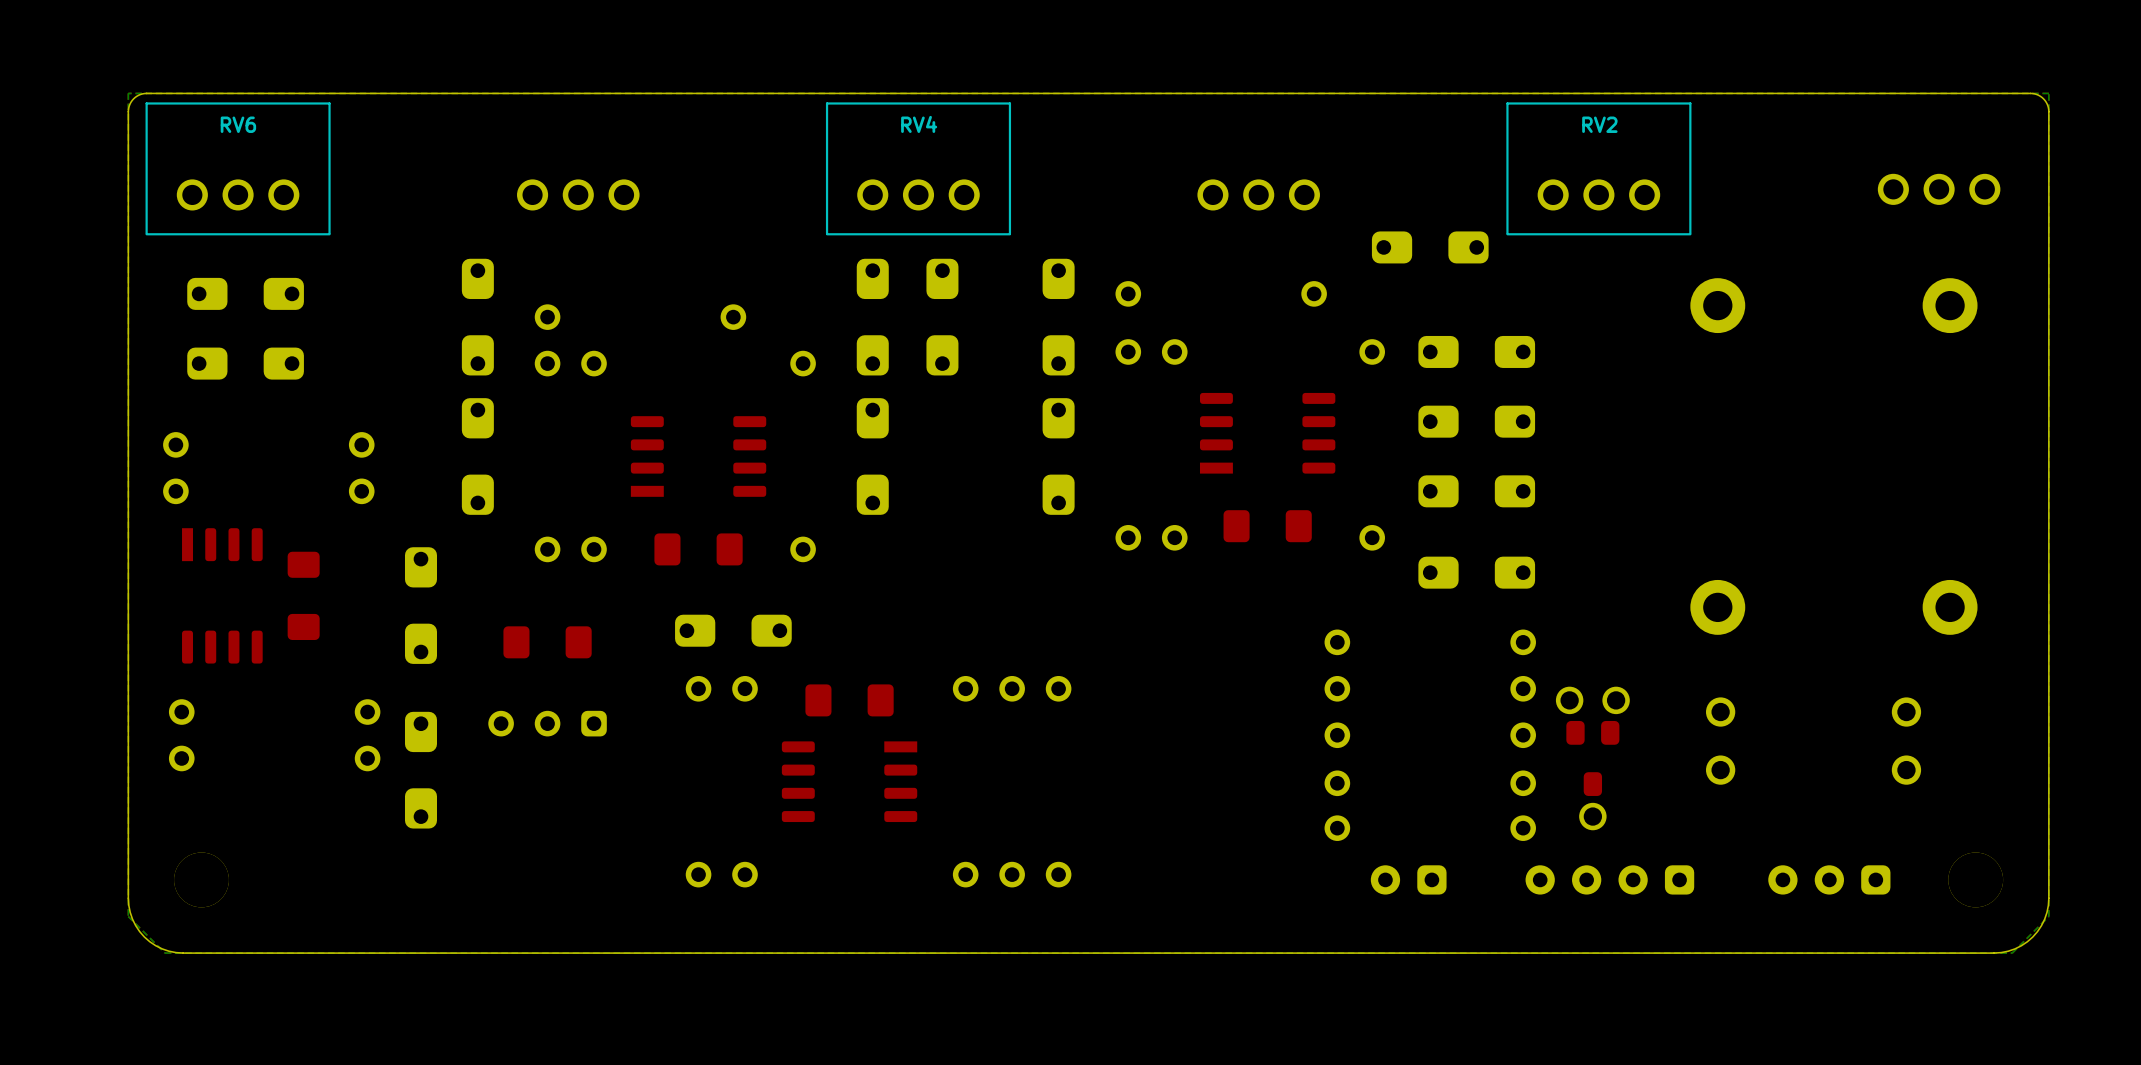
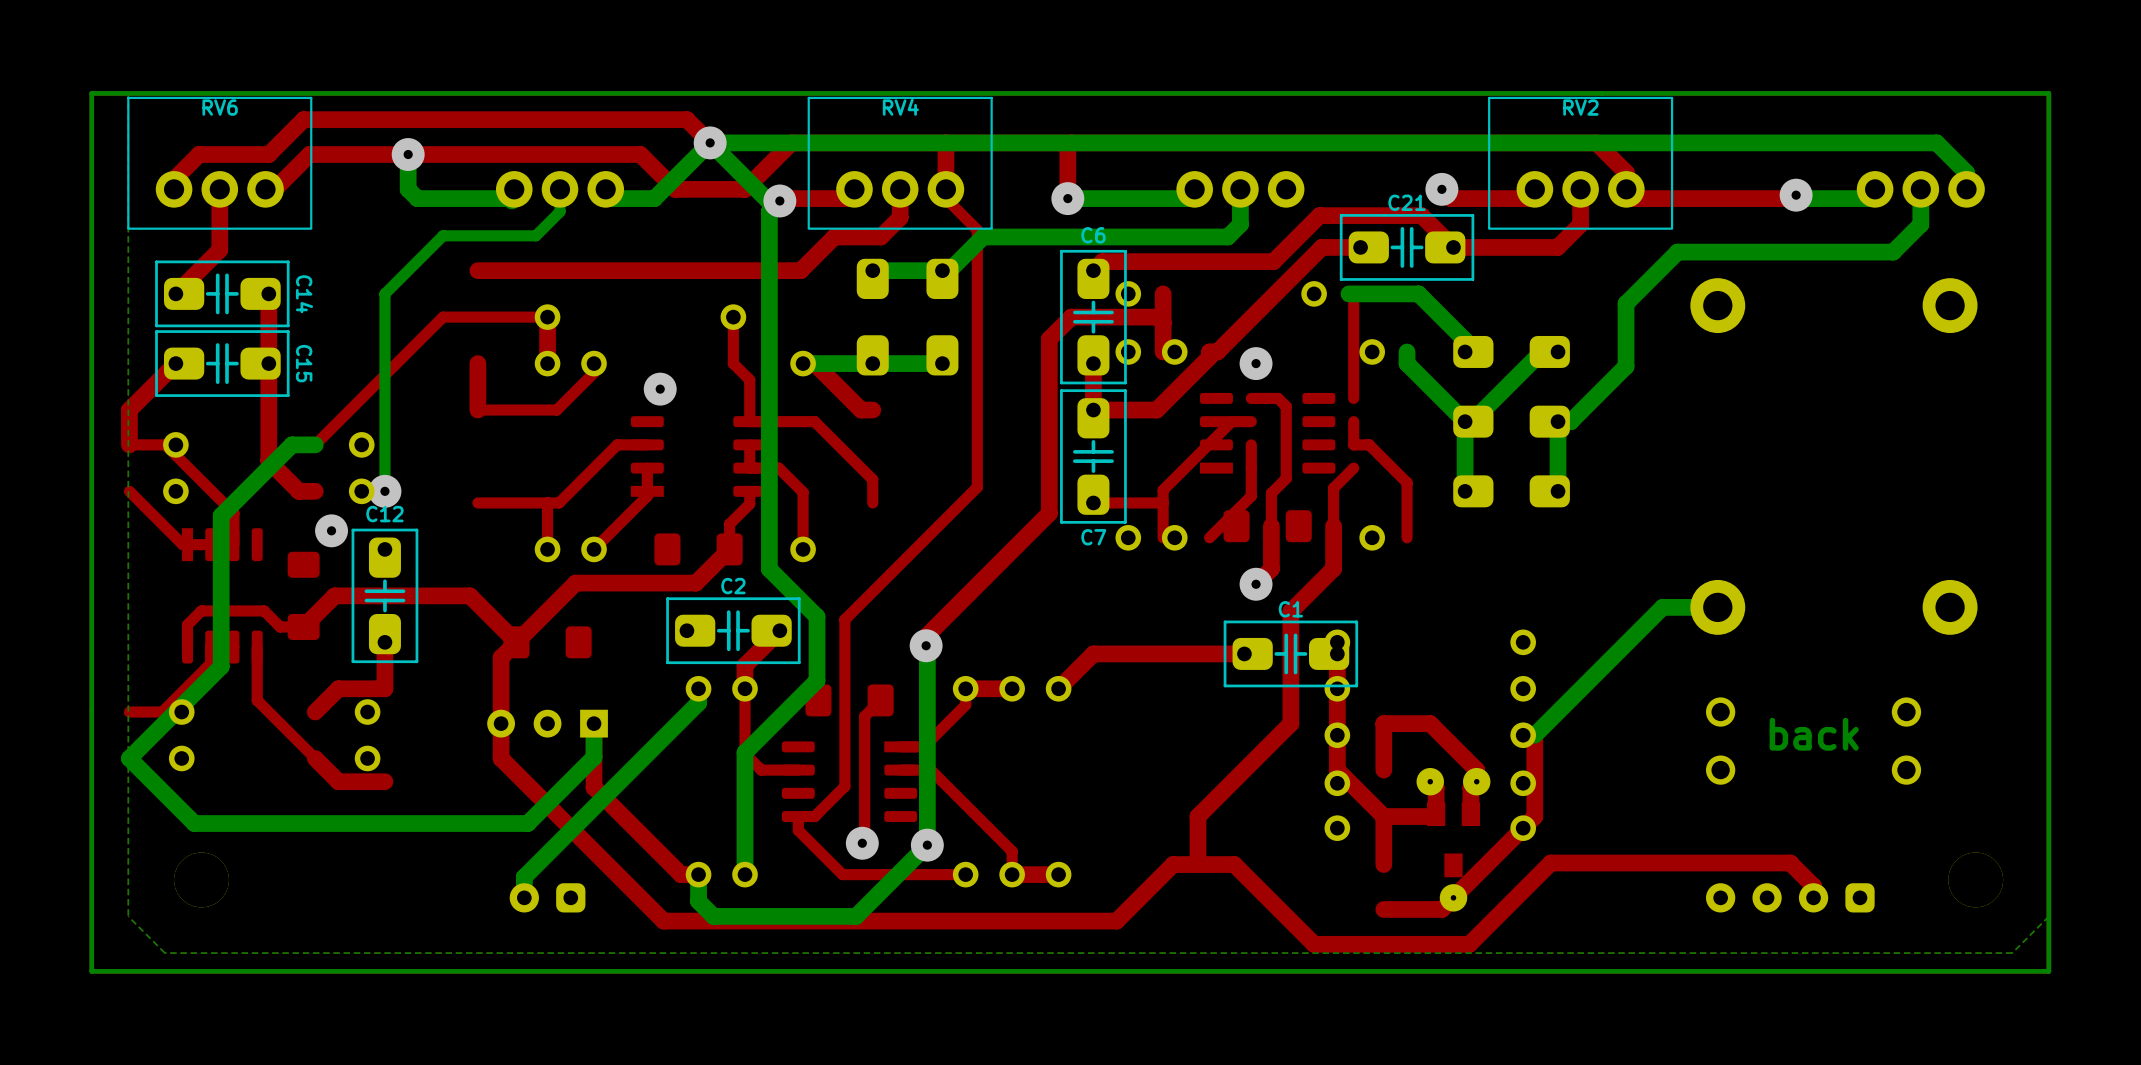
board edge: (2030, 93) (146, 93) (138, 95) (131, 101) (128, 111) (128, 898) (132, 919) (139, 931) (149, 941) (162, 948) (183, 953) (1993, 953) (2014, 948) (2027, 941) (2037, 931) (2044, 919) (2048, 898) (2048, 111) (2043, 98) (2030, 93) -> none
bottom track: none -> (2048, 93) (2048, 971) (91, 971) (91, 93) (2048, 93)
RV6 footprint: [145, 102, 331, 236] -> [127, 96, 313, 230]
RV4 footprint: [825, 102, 1012, 236] -> [807, 96, 993, 230]
RV2 footprint: [1506, 102, 1692, 236] -> [1488, 96, 1674, 230]
bottom track: none -> (710, 142) (654, 198) (605, 198)
bottom track: none -> (710, 142) (768, 200) (779, 200) (769, 211) (769, 569) (817, 616) (817, 680) (745, 752) (745, 874)
bottom track: none -> (710, 142) (1936, 142) (1966, 172) (1966, 198)
top track: none -> (710, 142) (686, 119) (303, 119) (268, 154) (199, 154) (174, 179) (174, 194) (178, 198) (174, 198)
via: none -> (710, 142)
top track: none -> (945, 142) (945, 198) (977, 229) (977, 487) (844, 619) (844, 786) (814, 816) (798, 816) (798, 830) (842, 874) (965, 874)
top track: none -> (1071, 142) (1067, 146) (1067, 198)
bottom track: none -> (408, 154) (408, 189) (417, 198) (514, 198) (511, 200)
via: none -> (408, 154)
part footprint: [1877, 173, 2001, 205] -> [1856, 171, 1985, 208]
part: none -> (560, 189)
part: none -> (1240, 189)
top track: none -> (1441, 189) (1451, 198) (1534, 198)
via: none -> (1441, 189)
part: (578, 194) -> none
part: (1258, 194) -> none
bottom track: none -> (1796, 195) (1799, 198) (1875, 198)
top track: none -> (1796, 195) (1792, 198) (1626, 198) (1626, 172) (1596, 142) (791, 142) (745, 189) (675, 189) (640, 154) (309, 154) (265, 198)
via: none -> (1796, 195)
top track: none -> (219, 198) (219, 250) (175, 293)
bottom track: none -> (560, 198) (560, 211) (535, 235) (443, 235) (384, 293) (384, 491)
top track: none -> (854, 198) (782, 198) (779, 200)
top track: none -> (900, 198) (900, 217) (880, 236) (834, 236) (800, 270) (477, 270)
via: none -> (1067, 198)
bottom track: none -> (1194, 198) (1067, 198)
bottom track: none -> (1240, 198) (1240, 224) (1227, 236) (983, 236) (949, 270) (872, 270)
top track: none -> (1580, 198) (1580, 224) (1557, 247) (1453, 247) (1421, 215) (1319, 215) (1273, 261) (1102, 261) (1093, 270)
bottom track: none -> (1920, 198) (1920, 224) (1893, 252) (1677, 252) (1626, 303) (1626, 366) (1570, 421) (1558, 421) (1558, 491)
via: none -> (779, 200)
top track: none -> (1360, 247) (1321, 247) (1217, 351) (1209, 351) (1209, 357) (1156, 410) (1093, 410) (1093, 363)
C21: none -> (1407, 247)
part: (1430, 247) -> none
C14: none -> (222, 293)
part: (245, 293) -> none
top track: none -> (268, 293) (268, 461) (299, 491) (315, 491)
top track: none -> (1163, 293) (1163, 351)
bottom track: none -> (1348, 293) (1418, 293) (1465, 340) (1465, 351)
top track: none -> (1348, 293) (1353, 298) (1353, 398)
part: (477, 317) -> none
top track: none -> (733, 317) (733, 363) (749, 379) (749, 421) (814, 421) (872, 479) (872, 502)
part: (1058, 317) -> none
C6: none -> (1093, 317)
top track: none -> (1163, 322) (1157, 317) (1071, 317) (1049, 339) (1049, 513) (926, 636) (926, 645)
bottom track: none -> (1407, 351) (1407, 363) (1465, 421)
part position: (1476, 351) -> (1511, 351)
bottom track: none -> (1558, 351) (1541, 351) (1472, 421) (1465, 421)
top track: none -> (175, 363) (129, 410) (129, 444) (165, 444) (233, 513) (233, 544)
C15: none -> (222, 363)
part: (245, 363) -> none
top track: none -> (547, 363) (547, 317) (443, 317) (315, 444)
top track: none -> (594, 363) (594, 372) (556, 410) (477, 410) (477, 363)
top track: none -> (803, 363) (814, 363) (861, 410) (872, 410)
bottom track: none -> (942, 363) (803, 363)
via: none -> (1256, 363)
via: none -> (660, 389)
top track: none -> (1251, 398) (1278, 398) (1286, 406) (1286, 478) (1271, 493) (1271, 568) (1256, 584)
top track: none -> (1251, 421) (1231, 421) (1163, 490) (1163, 537)
top track: none -> (1353, 421) (1353, 444) (1369, 444) (1407, 482) (1407, 537)
bottom track: none -> (1465, 421) (1465, 491)
part position: (1476, 421) -> (1511, 421)
bottom track: none -> (315, 444) (292, 444) (221, 515) (221, 666) (129, 758) (194, 823) (527, 823) (594, 757) (594, 723)
top track: none -> (647, 444) (617, 444) (559, 502) (477, 502)
top track: none -> (749, 444) (749, 468) (778, 468) (803, 492) (803, 549)
top track: none -> (1251, 444) (1251, 496) (1209, 537)
part: (477, 456) -> none
part: (872, 456) -> none
part: (1058, 456) -> none
C7: none -> (1093, 456)
top track: none -> (647, 468) (647, 496) (594, 549)
top track: none -> (1353, 468) (1333, 488) (1333, 568) (1290, 611) (1290, 723) (1197, 816) (1197, 864)
top track: none -> (129, 491) (182, 544) (210, 544)
via: none -> (384, 491)
top track: none -> (749, 491) (749, 504) (729, 524) (729, 549) (695, 583) (575, 583) (501, 657) (501, 758) (663, 921) (1116, 921) (1173, 864) (1234, 864) (1314, 944) (1469, 944) (1550, 863) (1790, 863) (1813, 886) (1813, 897)
part position: (1476, 491) -> (1511, 491)
top track: none -> (547, 502) (547, 549)
top track: none -> (1163, 502) (1093, 502)
via: none -> (331, 530)
part: (1476, 572) -> none
via: none -> (1256, 584)
C12: none -> (384, 595)
part: (420, 605) -> none
bottom track: none -> (1717, 607) (1662, 607) (1534, 735)
part: (733, 630) -> none
C2: none -> (733, 630)
top track: none -> (779, 630) (745, 665) (745, 753) (761, 770) (798, 770)
top track: none -> (384, 642) (384, 688) (338, 688) (315, 712)
top track: none -> (516, 642) (470, 595) (334, 595) (303, 626) (280, 626) (264, 610) (201, 610) (187, 624) (187, 647)
bottom track: none -> (926, 645) (927, 845) (856, 916) (713, 916) (698, 901) (698, 874) (698, 885)
via: none -> (926, 645)
top track: none -> (233, 647) (210, 647) (210, 663) (162, 712) (129, 712)
top track: none -> (257, 647) (257, 700) (338, 781) (384, 781)
top track: none -> (1244, 653) (1093, 653) (1058, 688)
C1: none -> (1290, 653)
top track: none -> (1337, 653) (1337, 770) (1383, 816)
bottom track: none -> (698, 688) (698, 702) (524, 877) (524, 897)
top track: none -> (1012, 688) (965, 688) (965, 705) (923, 746) (900, 746)
top track: none -> (880, 700) (864, 716) (864, 840)
part footprint: [488, 710, 607, 737] -> [487, 709, 608, 738]
top track: none -> (594, 723) (594, 787) (681, 874) (698, 874)
text: none -> back (1814, 734)
top track: none -> (1534, 735) (1534, 816) (1441, 909) (1383, 909)
part: (1592, 758) -> none
part: (420, 770) -> none
top track: none -> (900, 770) (930, 770) (1012, 851) (1012, 874) (1058, 874)
top track: none -> (1383, 770) (1383, 723) (1430, 723) (1476, 770) (1476, 781) (1470, 787) (1470, 814)
top track: none -> (1430, 781) (1436, 787) (1436, 814) (1433, 816) (1383, 816)
top track: none -> (1383, 816) (1383, 864)
part: none -> (1453, 839)
via: none -> (862, 843)
via: none -> (927, 845)
part: (1408, 879) -> none
part position: (1609, 879) -> (1790, 897)
part: (1829, 879) -> none
part: none -> (547, 897)

